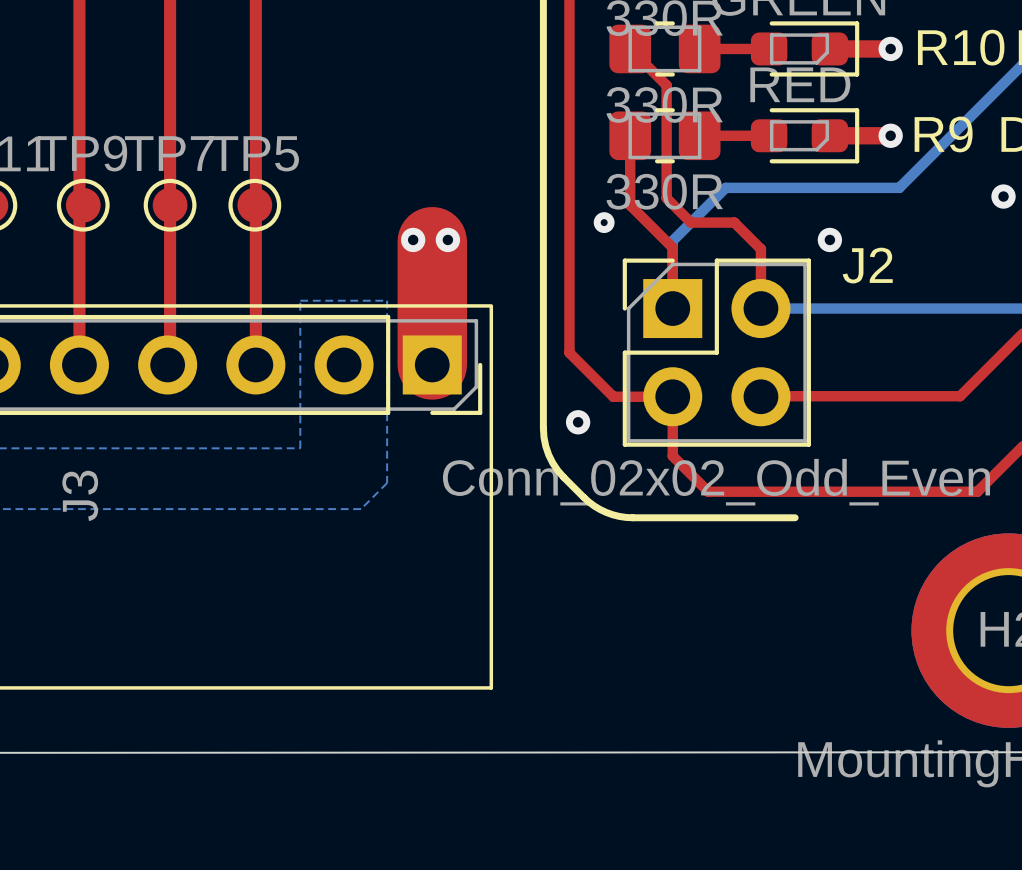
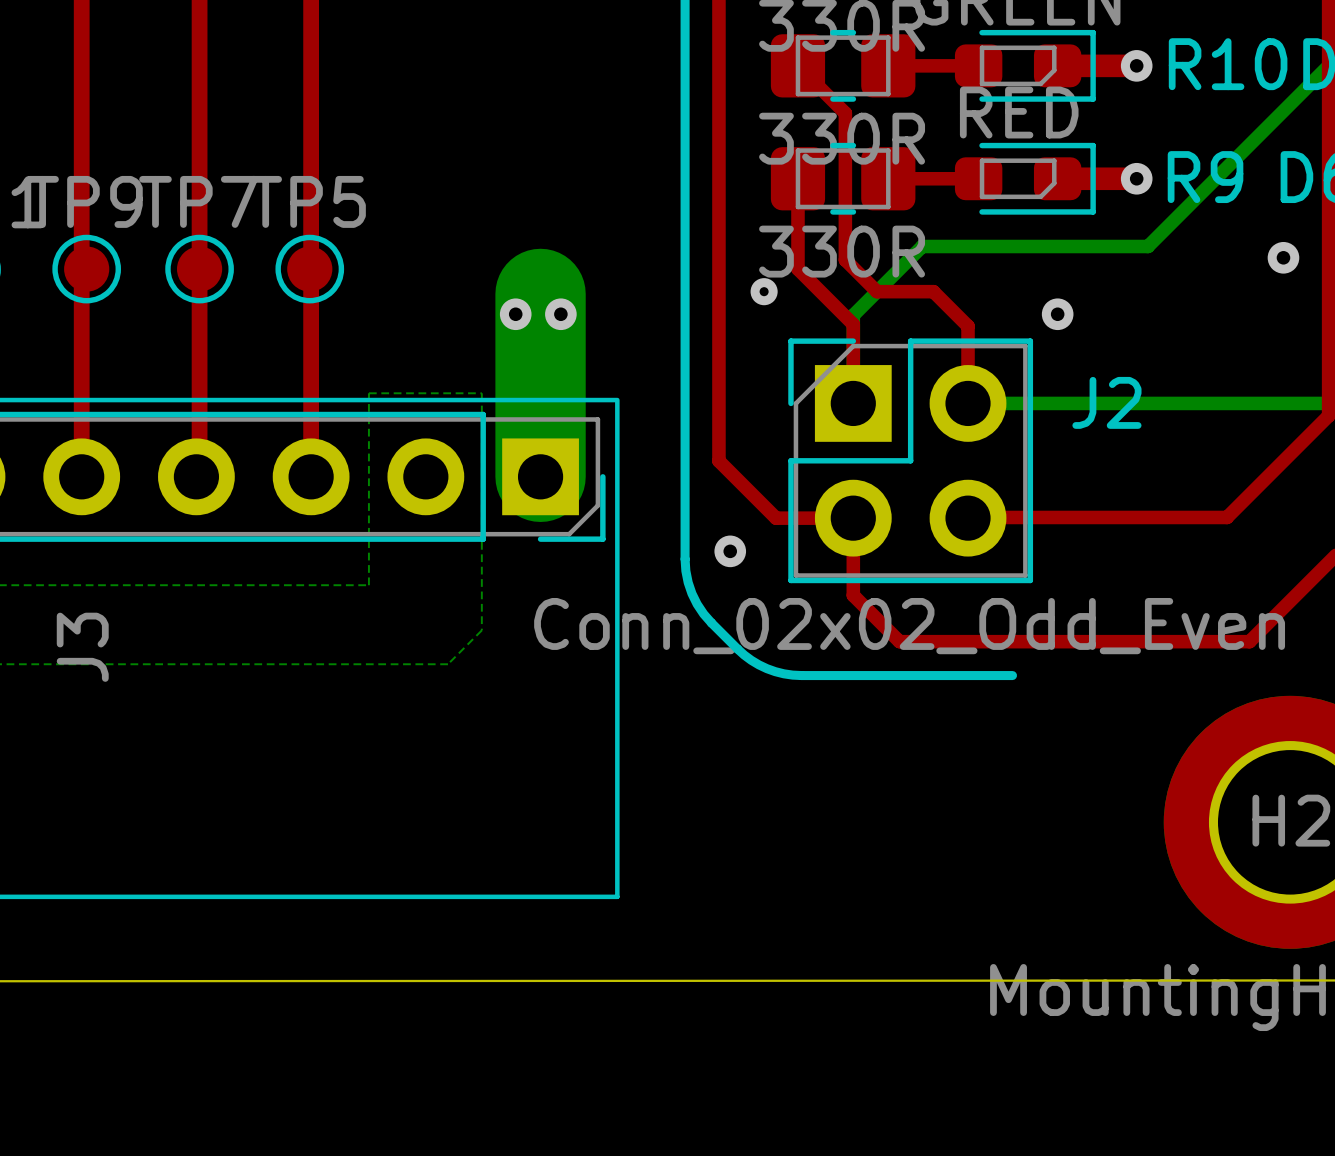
bottom track: none -> (540, 293) (540, 476)
top track: (432, 241) (432, 364) -> none
J2 name position: J2 (867, 265) -> J2 (1106, 402)

